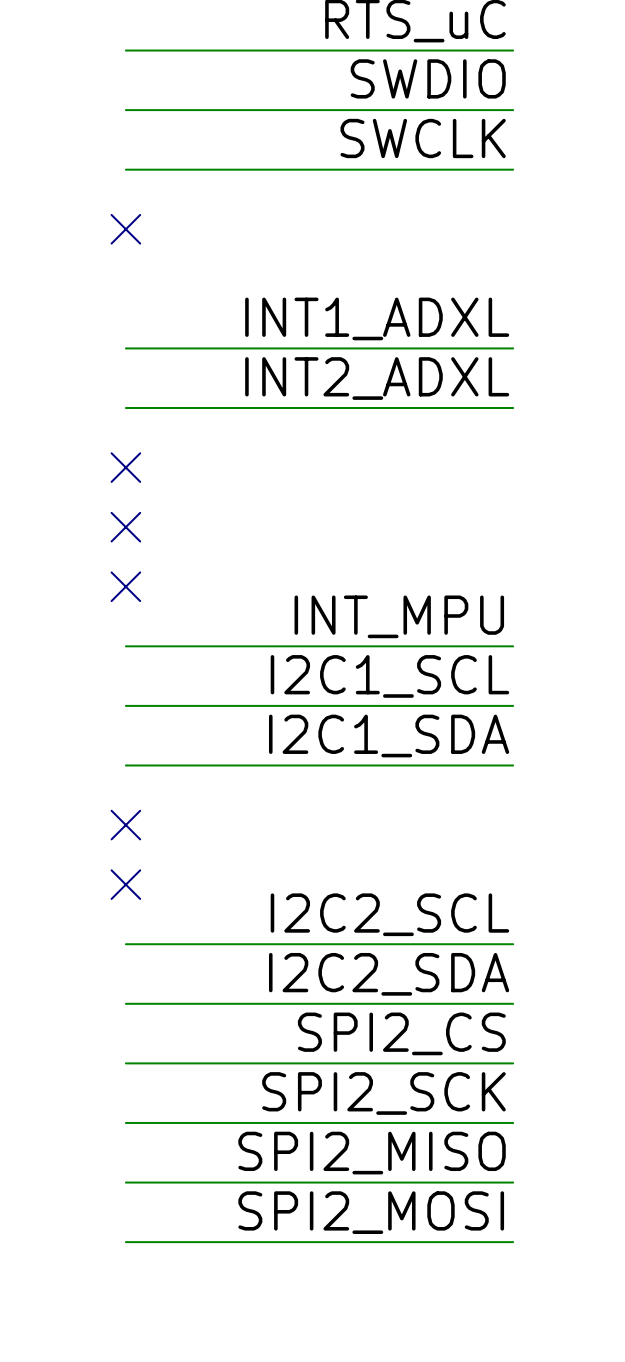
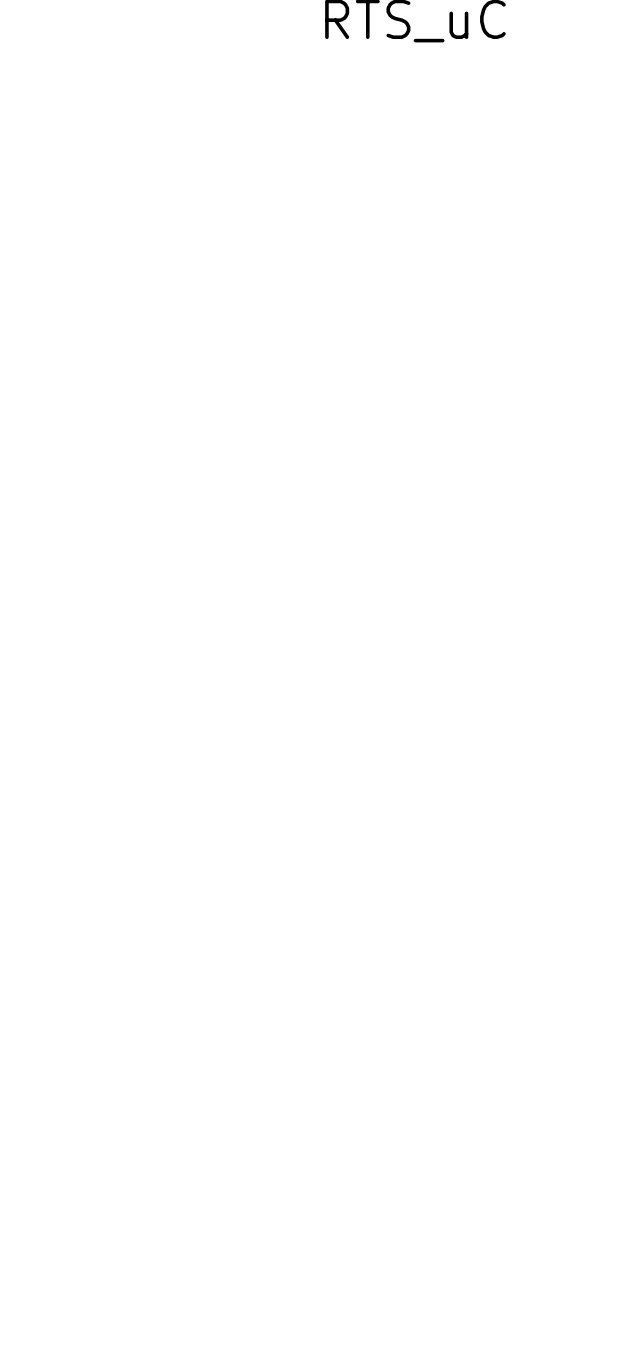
wire: (125, 50) (513, 50) -> none
label: SWDIO (428, 78) -> none
wire: (125, 110) (513, 110) -> none
label: SWCLK (423, 138) -> none
wire: (125, 169) (513, 169) -> none
no-connect mark: (125, 229) -> none
label: INT1_ADXL (377, 318) -> none
wire: (125, 348) (513, 348) -> none
label: INT2_ADXL (377, 378) -> none
wire: (125, 408) (513, 408) -> none
no-connect mark: (125, 467) -> none
no-connect mark: (125, 527) -> none
no-connect mark: (125, 586) -> none
label: INT_MPU (399, 616) -> none
wire: (125, 646) (513, 646) -> none
label: I2C1_SCL (389, 676) -> none
wire: (125, 705) (513, 705) -> none
label: I2C1_SDA (389, 736) -> none
wire: (125, 765) (513, 765) -> none
no-connect mark: (125, 825) -> none
no-connect mark: (125, 884) -> none
label: I2C2_SCL (389, 914) -> none
wire: (125, 944) (513, 944) -> none
label: I2C2_SDA (389, 974) -> none
wire: (125, 1003) (513, 1003) -> none
label: SPI2_CS (401, 1033) -> none
wire: (125, 1063) (513, 1063) -> none
label: SPI2_SCK (383, 1093) -> none
wire: (125, 1122) (513, 1122) -> none
label: SPI2_MISO (372, 1153) -> none
wire: (125, 1182) (513, 1182) -> none
label: SPI2_MOSI (371, 1212) -> none
wire: (125, 1242) (513, 1242) -> none

